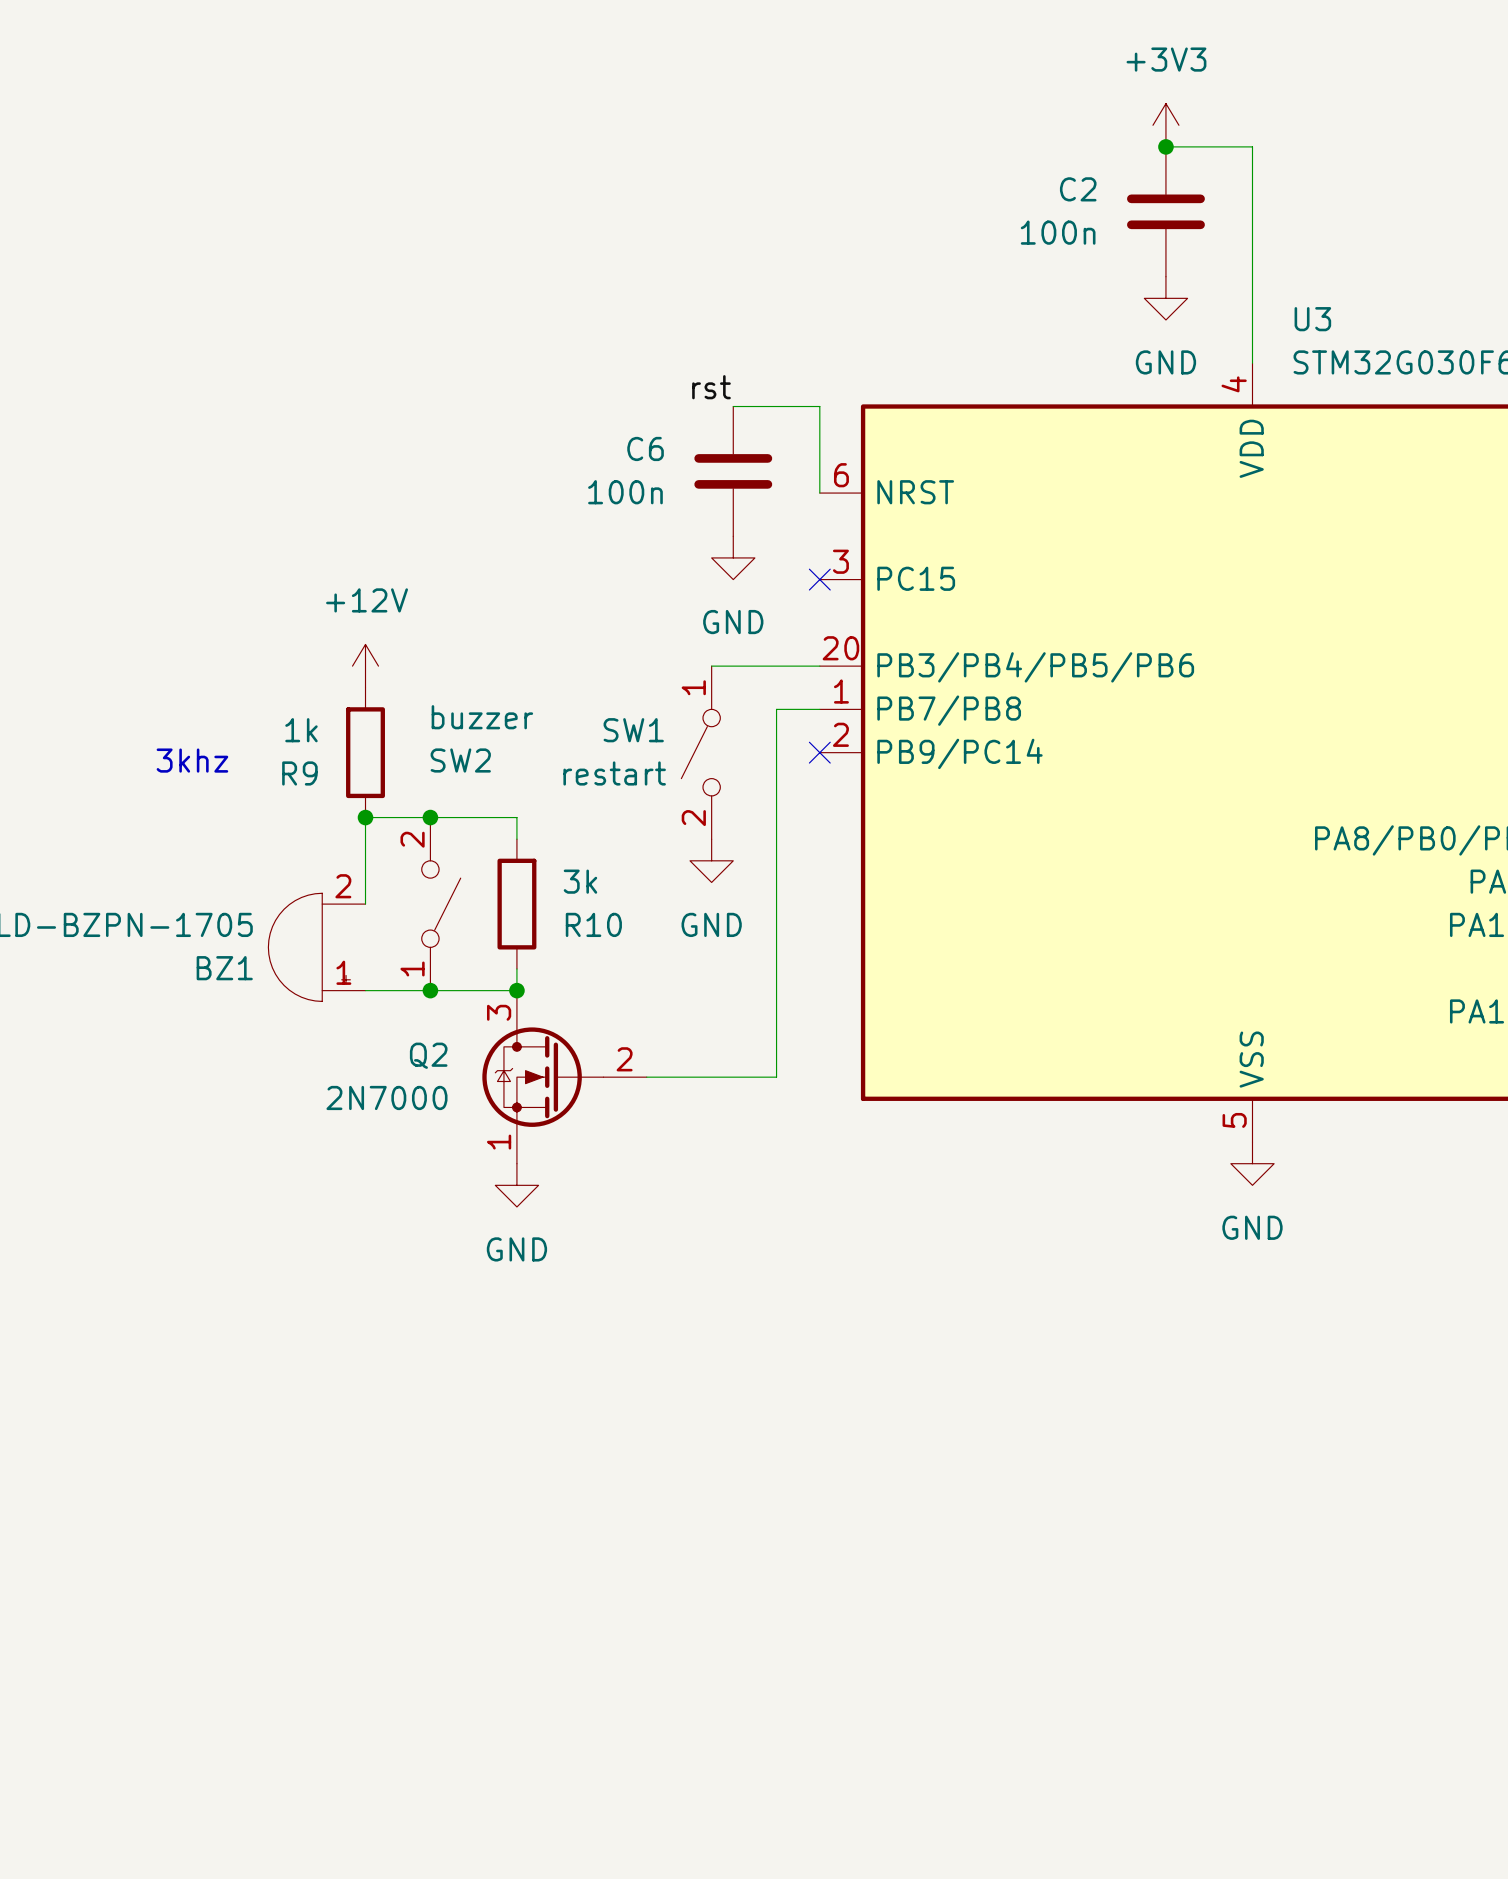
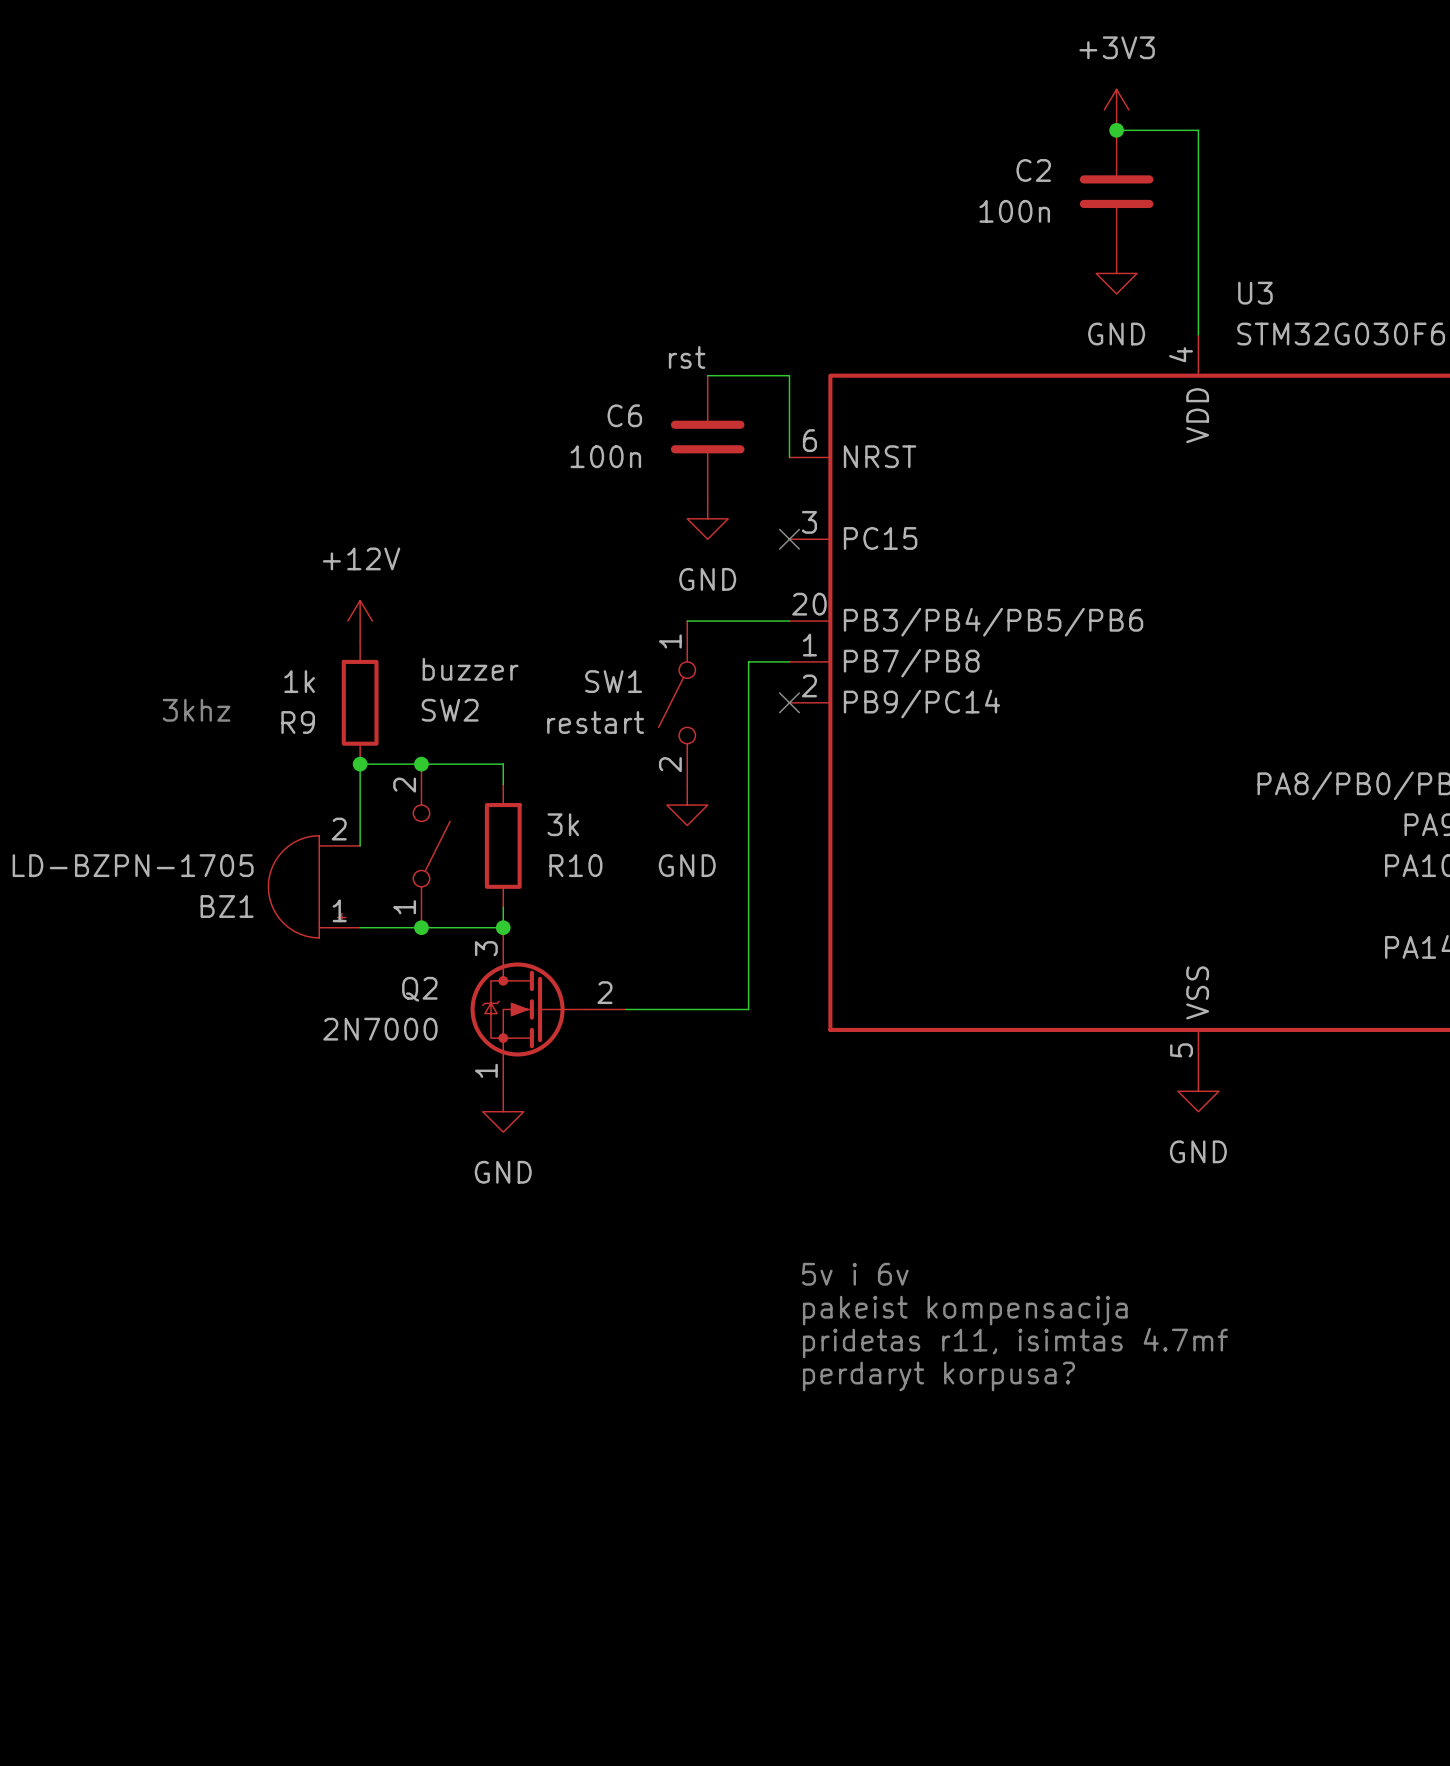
text: none -> 5v i 6v (855, 1274)
text: none -> pakeist kompensacija (965, 1310)
text: none -> pridetas r11, isimtas 4.7mf (1015, 1343)
text: none -> perdaryt korpusa? (938, 1376)

